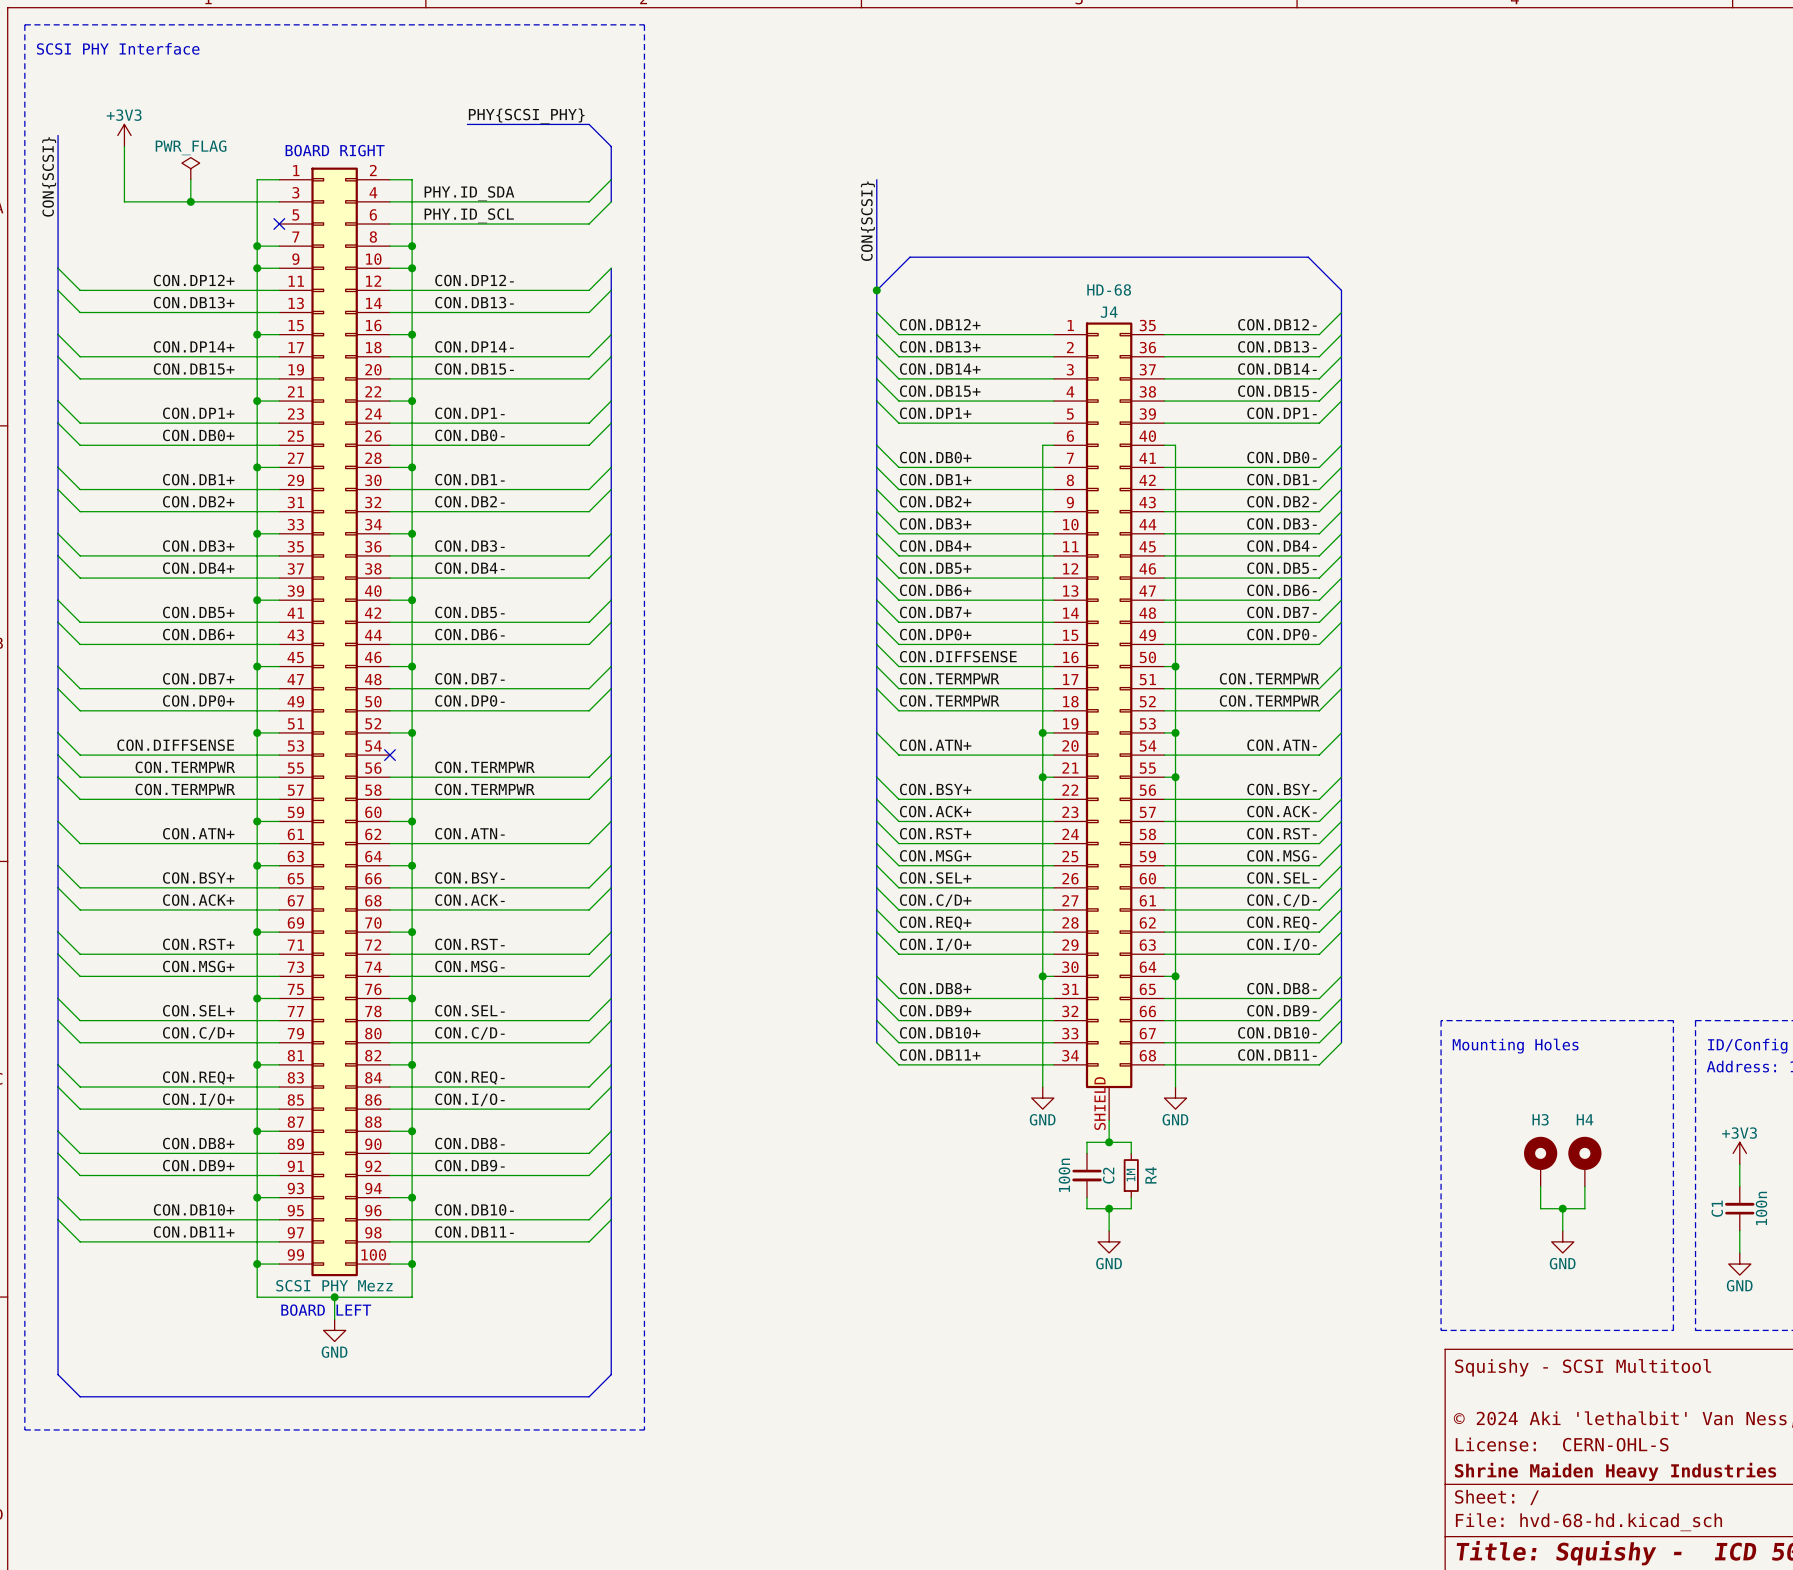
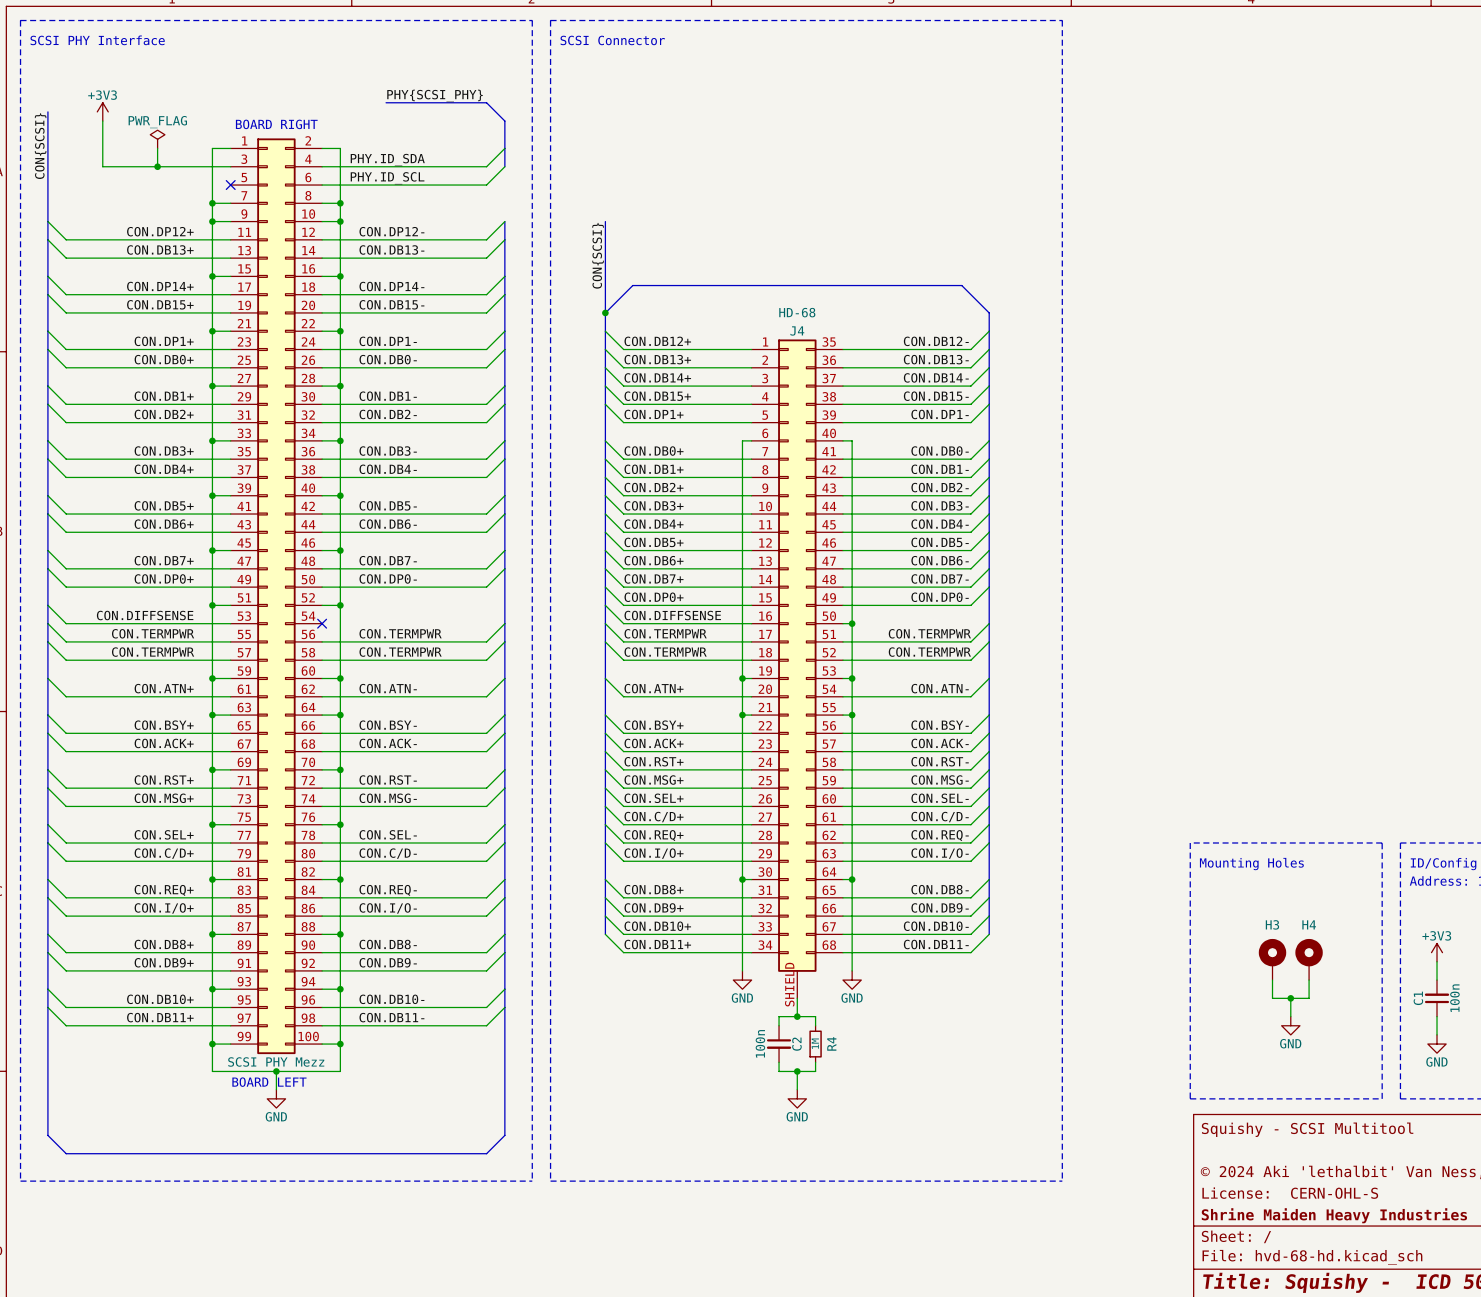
line: none -> (550, 20) (550, 1181) (1062, 1181) (1062, 20) (550, 20)
text: none -> SCSI Connector (612, 40)
bus: (876, 179) (876, 1042) -> (605, 221) (605, 934)
label position: CON{SCSI} (867, 221) -> CON{SCSI} (598, 255)
bus: (876, 290) (909, 257) (1308, 257) (1341, 290) (1341, 1042) -> (605, 312) (632, 285) (961, 285) (989, 312) (989, 934)
junction: (876, 290) -> none
wire: (876, 312) (898, 334) (1053, 334) -> none
wire: (1341, 312) (1319, 334) (1164, 334) -> none
label position: CON.DB12+ (940, 324) -> CON.DB12+ (657, 341)
label position: CON.DB12- (1277, 324) -> CON.DB12- (936, 341)
wire: (876, 334) (898, 356) (1053, 356) -> (605, 349) (623, 367) (751, 367)
wire: (1341, 334) (1319, 356) (1164, 356) -> none
label position: CON.DB13+ (940, 346) -> CON.DB13+ (657, 359)
label position: CON.DB13- (1277, 346) -> CON.DB13- (936, 359)
wire: (876, 356) (898, 378) (1053, 378) -> none
wire: (1341, 356) (1319, 378) (1164, 378) -> none
label position: CON.DB14+ (940, 369) -> CON.DB14+ (657, 377)
label position: CON.DB14- (1277, 369) -> CON.DB14- (936, 377)
junction: none -> (605, 312)
wire: (876, 378) (898, 401) (1053, 401) -> none
wire: (1341, 378) (1319, 401) (1164, 401) -> none
label position: CON.DB15+ (940, 391) -> CON.DB15+ (657, 396)
label position: CON.DB15- (1277, 391) -> CON.DB15- (936, 396)
wire: (876, 401) (898, 423) -> (605, 331) (623, 349) (742, 349)
wire: (1341, 401) (1319, 423) (1175, 423) -> (989, 331) (970, 349)
label position: CON.DP1+ (935, 413) -> CON.DP1+ (654, 414)
label position: CON.DP1- (1282, 413) -> CON.DP1- (940, 414)
wire: (876, 445) (898, 467) -> (605, 367) (623, 386) (742, 386)
wire: (1042, 445) (1042, 1087) -> (861, 367) (842, 367)
wire: (1175, 445) (1175, 1087) -> (970, 367) (989, 349)
wire: (1341, 445) (1319, 467) (1175, 467) -> (989, 367) (970, 386)
label position: CON.DB0+ (935, 457) -> CON.DB0+ (654, 451)
label position: CON.DB0- (1282, 457) -> CON.DB0- (940, 451)
wire: (876, 467) (898, 489) -> (605, 386) (623, 404) (742, 404)
wire: (1341, 467) (1319, 489) (1175, 489) -> (989, 386) (970, 404)
label position: CON.DB1+ (935, 479) -> CON.DB1+ (654, 469)
label position: CON.DB1- (1282, 479) -> CON.DB1- (940, 469)
wire: (876, 489) (898, 511) -> (605, 404) (623, 422) (742, 422)
wire: (1341, 489) (1319, 511) (1175, 511) -> (989, 404) (970, 422)
label position: CON.DB2+ (935, 501) -> CON.DB2+ (654, 487)
label position: CON.DB2- (1282, 501) -> CON.DB2- (940, 487)
wire: (876, 511) (898, 533) -> (742, 970) (742, 440)
wire: (1341, 511) (1319, 533) (1164, 533) -> none
label position: CON.DB3+ (935, 523) -> CON.DB3+ (654, 505)
label position: CON.DB3- (1282, 523) -> CON.DB3- (940, 505)
wire: (876, 533) (898, 555) -> (605, 440) (623, 459) (742, 459)
wire: (1031, 533) (1053, 533) -> (852, 440) (852, 970)
wire: (1341, 533) (1319, 555) (1175, 555) -> (989, 440) (970, 459)
label position: CON.DB4+ (935, 546) -> CON.DB4+ (654, 524)
label position: CON.DB4- (1282, 546) -> CON.DB4- (940, 524)
wire: (876, 555) (898, 578) -> (605, 459) (623, 477) (742, 477)
wire: (1341, 555) (1319, 578) (1175, 578) -> (989, 459) (970, 477)
label position: CON.DB5+ (935, 568) -> CON.DB5+ (654, 542)
label position: CON.DB5- (1282, 568) -> CON.DB5- (940, 542)
wire: (876, 578) (898, 600) -> (605, 477) (623, 495) (742, 495)
wire: (1341, 578) (1319, 600) (1175, 600) -> (989, 477) (970, 495)
label position: CON.DB6+ (935, 590) -> CON.DB6+ (654, 560)
label position: CON.DB6- (1282, 590) -> CON.DB6- (940, 560)
wire: (876, 600) (898, 622) -> (605, 495) (623, 514) (742, 514)
wire: (1341, 600) (1319, 622) (1175, 622) -> (989, 495) (970, 514)
label position: CON.DB7+ (935, 612) -> CON.DB7+ (654, 578)
label position: CON.DB7- (1282, 612) -> CON.DB7- (940, 578)
wire: (876, 622) (898, 644) -> (605, 514) (623, 532) (742, 532)
wire: (1341, 622) (1319, 644) (1175, 644) -> (989, 514) (970, 532)
label position: CON.DP0+ (935, 634) -> CON.DP0+ (654, 597)
label position: CON.DP0- (1282, 634) -> CON.DP0- (940, 597)
wire: (876, 644) (898, 666) -> (605, 532) (623, 550) (742, 550)
wire: none -> (989, 532) (970, 550)
label position: CON.DIFFSENSE (958, 656) -> CON.DIFFSENSE (672, 615)
wire: (876, 666) (898, 688) -> (605, 550) (623, 568) (742, 568)
junction: (1175, 666) -> none
wire: (1341, 666) (1319, 688) (1175, 688) -> (989, 550) (970, 568)
label: CON.TERMPWR (949, 678) -> none
label: CON.TERMPWR (1269, 678) -> none
wire: (876, 688) (898, 710) -> (605, 568) (623, 587) (742, 587)
wire: (1341, 688) (1319, 710) (1175, 710) -> (989, 568) (970, 587)
label: CON.TERMPWR (949, 700) -> none
label: CON.TERMPWR (1269, 700) -> none
wire: none -> (605, 587) (623, 605) (751, 605)
wire: none -> (989, 587) (970, 605)
J4 position: (1109, 721) -> (797, 668)
wire: (876, 732) (898, 755) -> (605, 605) (623, 623) (742, 623)
junction: (1042, 732) -> none
junction: (1175, 732) -> none
wire: (1341, 732) (1319, 755) (1164, 755) -> none
label position: CON.ATN+ (935, 745) -> CON.ATN+ (654, 688)
label position: CON.ATN- (1282, 745) -> CON.ATN- (940, 688)
wire: none -> (605, 623) (623, 641) (751, 641)
wire: (1031, 755) (1053, 755) -> none
junction: none -> (852, 623)
wire: none -> (989, 623) (970, 641)
label: none -> CON.TERMPWR (665, 633)
label: none -> CON.TERMPWR (929, 633)
wire: (876, 777) (898, 799) -> (605, 641) (623, 660) (742, 660)
junction: (1042, 777) -> none
junction: (1175, 777) -> none
wire: (1341, 777) (1319, 799) (1175, 799) -> (989, 641) (970, 660)
label: none -> CON.TERMPWR (665, 652)
label position: CON.BSY+ (935, 789) -> CON.BSY+ (654, 725)
label: none -> CON.TERMPWR (929, 652)
label position: CON.BSY- (1282, 789) -> CON.BSY- (940, 725)
wire: (876, 799) (898, 821) -> none
wire: (1341, 799) (1319, 821) (1164, 821) -> none
label position: CON.ACK+ (935, 811) -> CON.ACK+ (654, 743)
label position: CON.ACK- (1282, 811) -> CON.ACK- (940, 743)
wire: (876, 821) (898, 843) -> (605, 678) (623, 696) (742, 696)
junction: none -> (742, 678)
wire: (1031, 821) (1053, 821) -> (842, 605) (861, 605)
junction: none -> (852, 678)
wire: (1341, 821) (1319, 843) (1175, 843) -> (989, 678) (970, 696)
label position: CON.RST+ (935, 833) -> CON.RST+ (654, 761)
label position: CON.RST- (1282, 833) -> CON.RST- (940, 761)
wire: (876, 843) (898, 865) -> none
wire: (1341, 843) (1319, 865) (1164, 865) -> none
label position: CON.MSG+ (935, 855) -> CON.MSG+ (654, 780)
label position: CON.MSG- (1282, 855) -> CON.MSG- (940, 780)
wire: (876, 865) (898, 887) -> (605, 715) (623, 733) (742, 733)
junction: none -> (742, 715)
wire: (1031, 865) (1053, 865) -> (842, 641) (861, 641)
junction: none -> (852, 715)
wire: (1341, 865) (1319, 887) (1175, 887) -> (989, 715) (970, 733)
label position: CON.SEL+ (935, 877) -> CON.SEL+ (654, 798)
label position: CON.SEL- (1282, 877) -> CON.SEL- (940, 798)
wire: (876, 887) (898, 909) -> (605, 733) (623, 751) (742, 751)
wire: (1341, 887) (1319, 909) (1175, 909) -> (989, 733) (970, 751)
label position: CON.C/D+ (935, 900) -> CON.C/D+ (654, 817)
label position: CON.C/D- (1282, 900) -> CON.C/D- (940, 817)
wire: (876, 909) (898, 932) -> (605, 751) (623, 769) (742, 769)
wire: (1341, 909) (1319, 932) (1175, 932) -> (989, 751) (970, 769)
label position: CON.REQ+ (935, 923) -> CON.REQ+ (654, 835)
label position: CON.REQ- (1282, 923) -> CON.REQ- (940, 835)
wire: (876, 932) (898, 954) -> (605, 769) (623, 788) (742, 788)
wire: (1341, 932) (1319, 954) (1175, 954) -> (989, 769) (970, 788)
label position: CON.I/O+ (935, 944) -> CON.I/O+ (654, 853)
label position: CON.I/O- (1282, 944) -> CON.I/O- (940, 853)
wire: none -> (605, 788) (623, 806) (751, 806)
wire: none -> (989, 788) (970, 806)
wire: (876, 976) (898, 998) -> (605, 806) (623, 824) (742, 824)
junction: (1042, 976) -> none
junction: (1175, 976) -> none
wire: (1341, 976) (1319, 998) (1175, 998) -> (989, 806) (970, 824)
label position: CON.DB8+ (935, 988) -> CON.DB8+ (654, 889)
label position: CON.DB8- (1282, 988) -> CON.DB8- (940, 889)
wire: (876, 998) (898, 1020) -> (605, 824) (623, 842) (742, 842)
wire: (1341, 998) (1319, 1020) (1175, 1020) -> (989, 824) (970, 842)
label position: CON.DB9+ (935, 1010) -> CON.DB9+ (654, 907)
label position: CON.DB9- (1282, 1010) -> CON.DB9- (940, 907)
wire: (876, 1020) (898, 1042) -> (605, 842) (623, 861) (742, 861)
wire: (1341, 1020) (1319, 1042) (1175, 1042) -> (989, 842) (970, 861)
label position: CON.DB10+ (940, 1032) -> CON.DB10+ (657, 926)
label position: CON.DB10- (1277, 1032) -> CON.DB10- (936, 926)
wire: (876, 1042) (898, 1064) -> none
wire: (1341, 1042) (1319, 1064) (1164, 1064) -> (989, 934) (970, 952) (842, 952)
label position: CON.DB11+ (940, 1055) -> CON.DB11+ (657, 944)
label position: CON.DB11- (1277, 1055) -> CON.DB11- (936, 944)
wire: none -> (605, 879) (623, 897) (751, 897)
junction: none -> (742, 879)
wire: (1031, 1064) (1053, 1064) -> (842, 806) (861, 806)
junction: none -> (852, 879)
wire: none -> (989, 879) (970, 897) (842, 897)
wire: none -> (605, 897) (623, 916) (751, 916)
wire: none -> (989, 897) (970, 916) (842, 916)
power symbol: GND (1042, 1098) -> none
power symbol: GND (1175, 1098) -> none
wire: none -> (605, 916) (623, 934) (751, 934)
wire: none -> (989, 916) (970, 934) (842, 934)
wire: (1109, 1120) (1109, 1142) -> (797, 998) (797, 1016)
wire: none -> (605, 934) (623, 952) (751, 952)
junction: (1109, 1142) -> none
wire: (1087, 1153) (1087, 1142) (1131, 1142) (1131, 1153) -> (779, 1025) (779, 1016) (815, 1016) (815, 1025)
C2 position: (1087, 1175) -> (779, 1044)
R4 position: (1131, 1175) -> (815, 1044)
power symbol: none -> GND (742, 980)
power symbol: none -> GND (852, 980)
wire: (1087, 1197) (1087, 1208) (1131, 1208) (1131, 1197) -> (779, 1062) (779, 1071) (815, 1071) (815, 1062)
wire: (1109, 1208) (1109, 1230) -> (797, 1071) (797, 1089)
junction: (1109, 1208) -> none
junction: none -> (797, 1016)
power symbol: GND (1109, 1241) -> none
junction: none -> (797, 1071)
power symbol: none -> GND (797, 1098)

